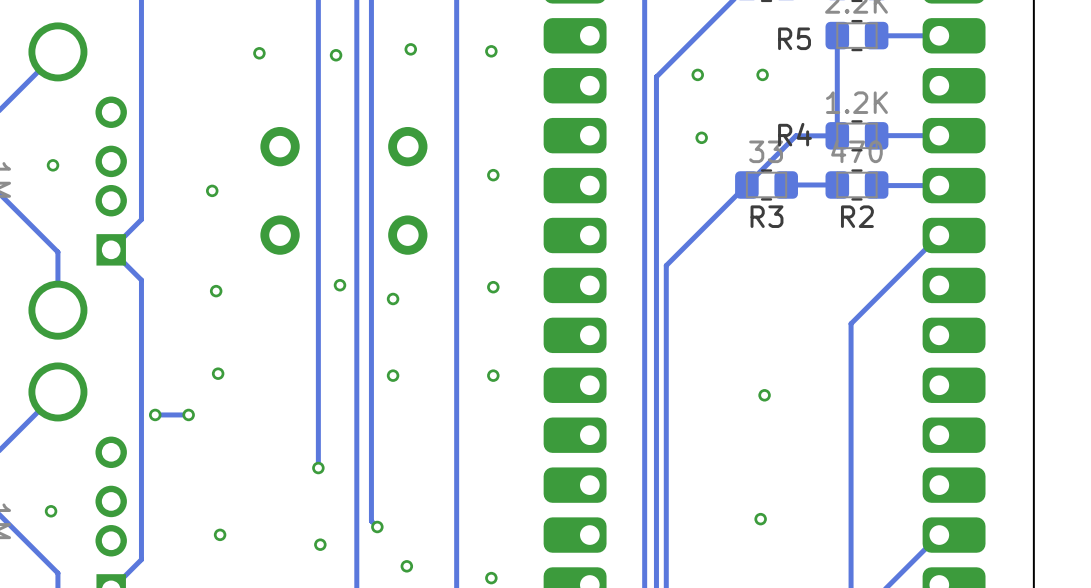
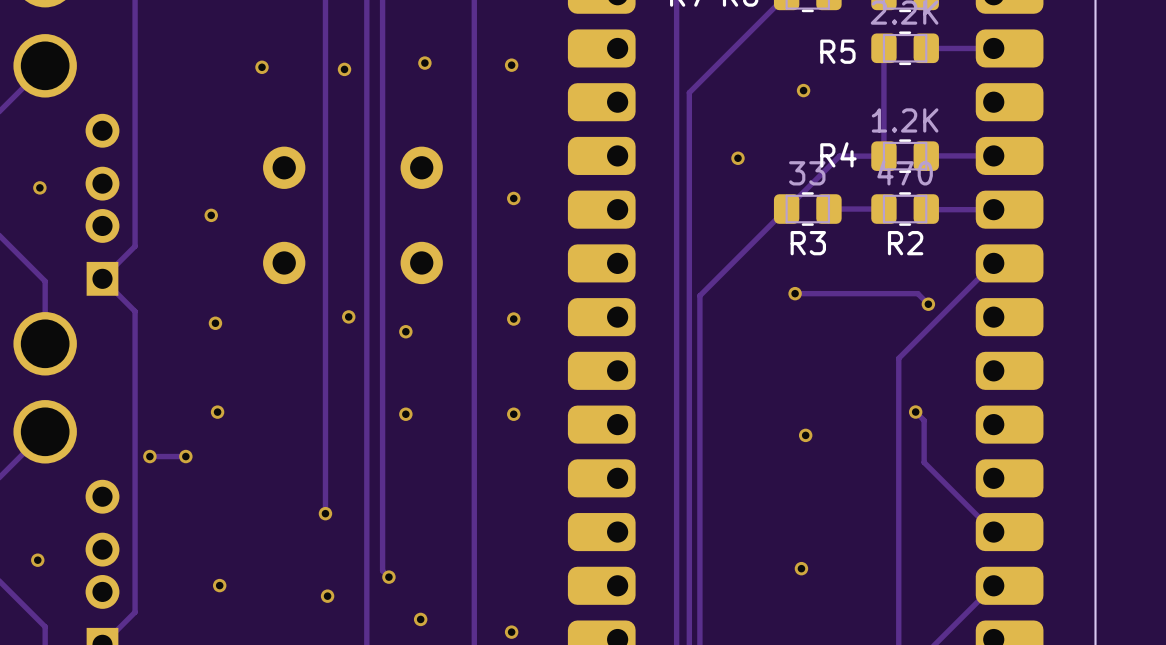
via: (697, 74) -> none
track: none -> (795, 293) (917, 293) (928, 304)
via: none -> (795, 293)
via: none -> (928, 304)
track: none -> (915, 412) (924, 420) (924, 462) (993, 532)
via: none -> (915, 412)

